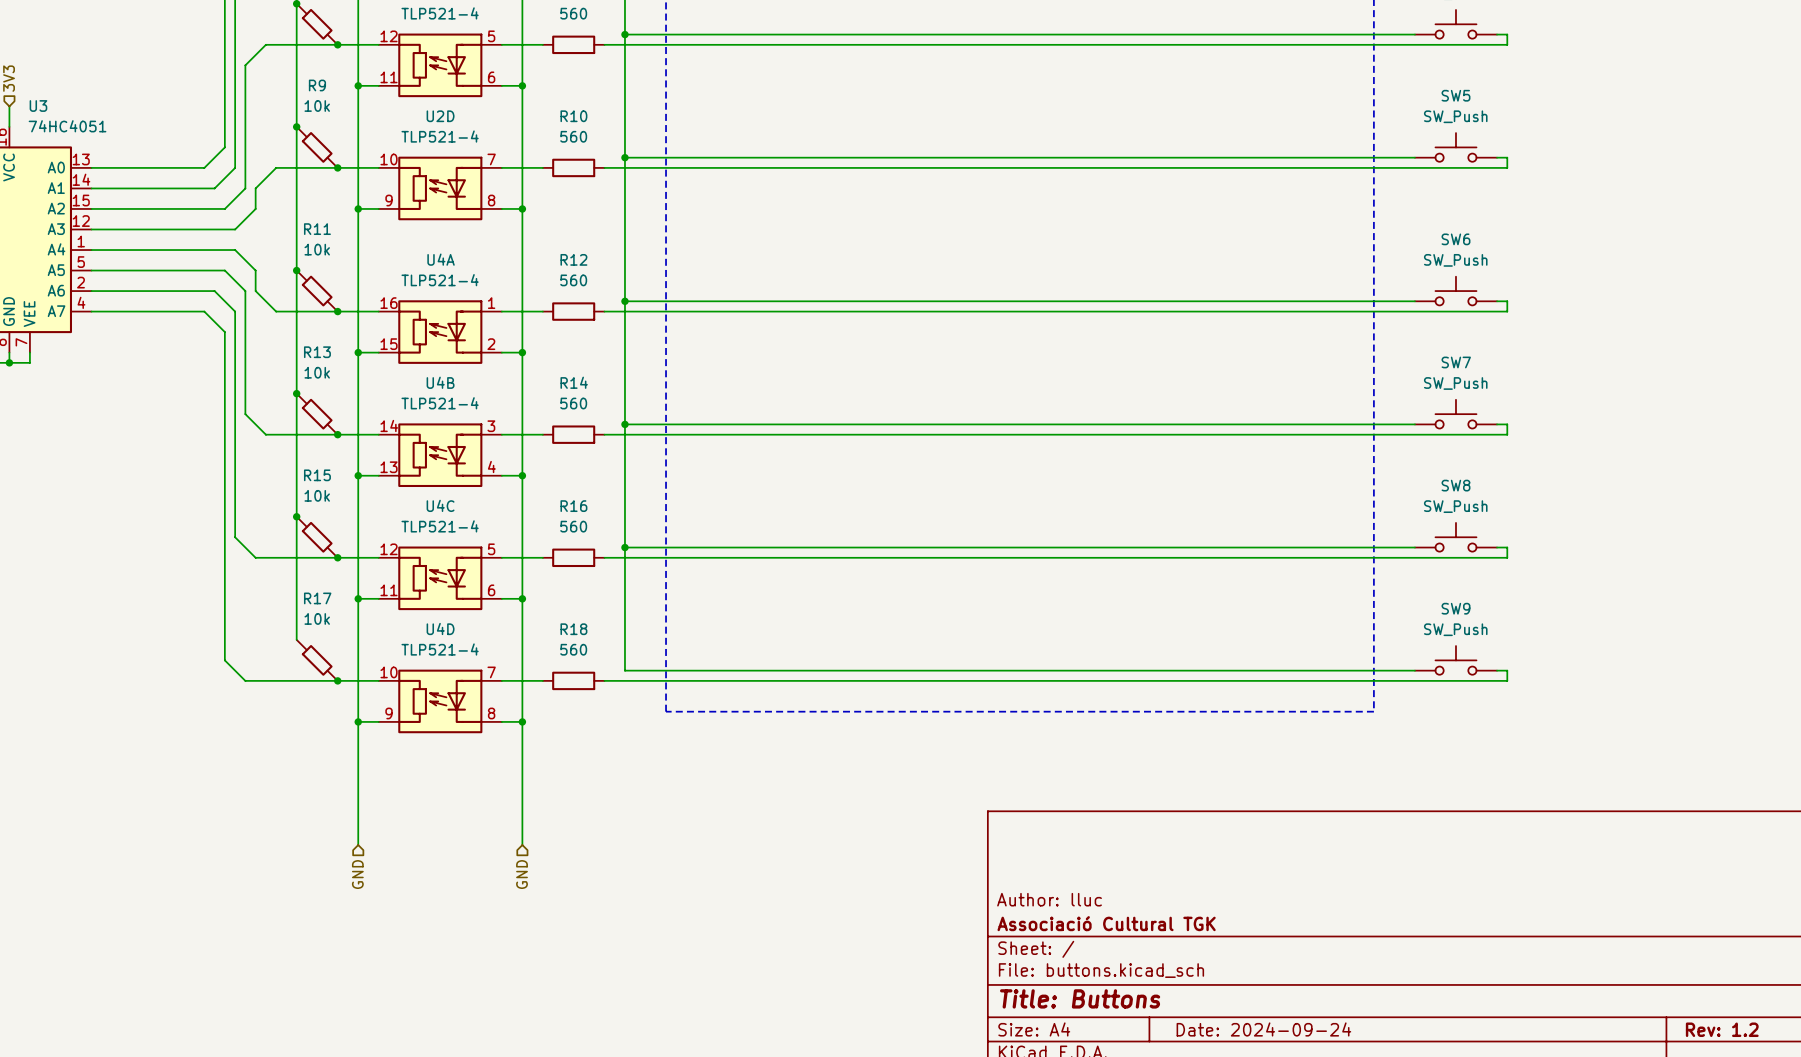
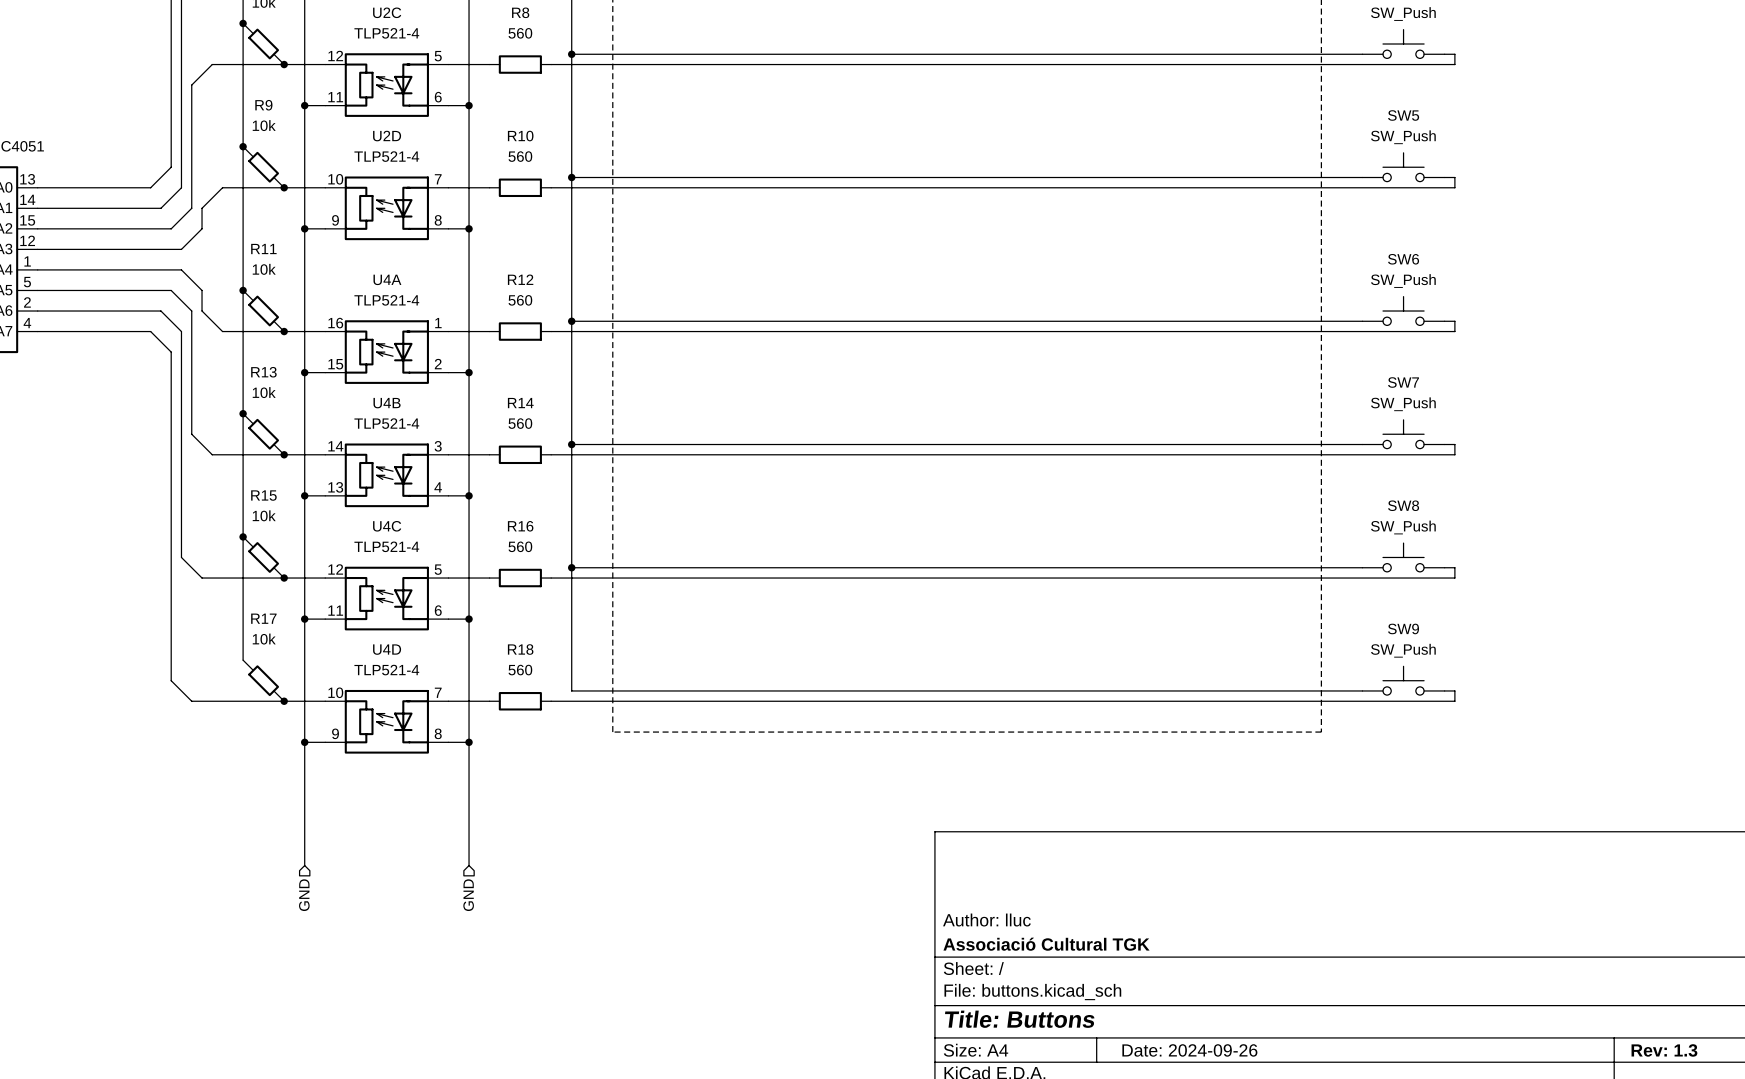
title block: Date: 2024-09-24 (1263, 1029) -> Date: 2024-09-26 (1189, 1050)
title block: Rev: 1.2 (1722, 1029) -> Rev: 1.3 (1664, 1050)

